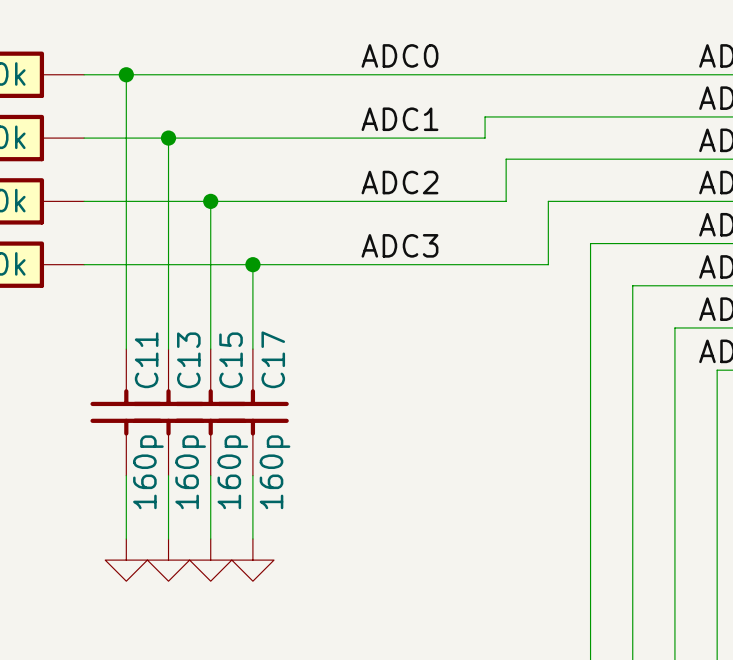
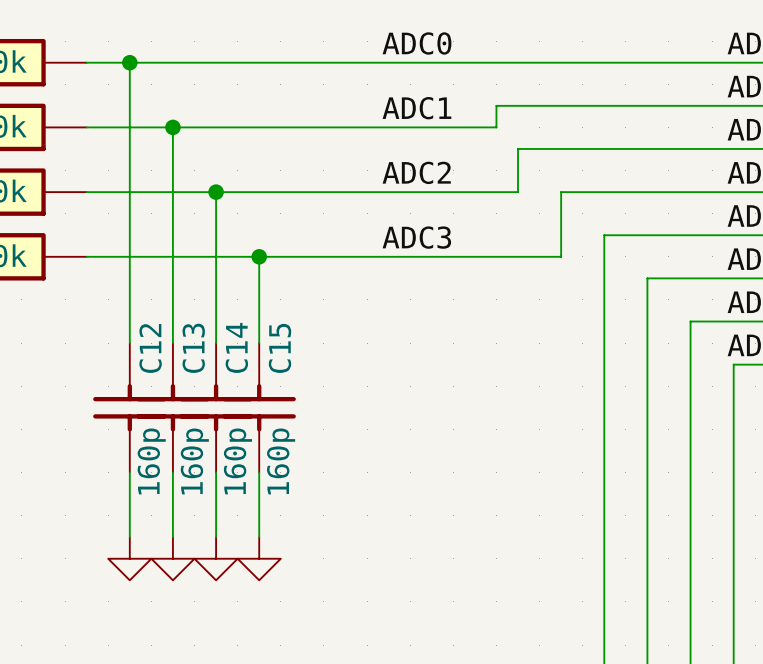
C17 name: C17 (273, 359) -> C15 (279, 348)
C11 name: C11 (146, 360) -> C12 (150, 348)
C15 name: C15 (231, 360) -> C14 (236, 347)

